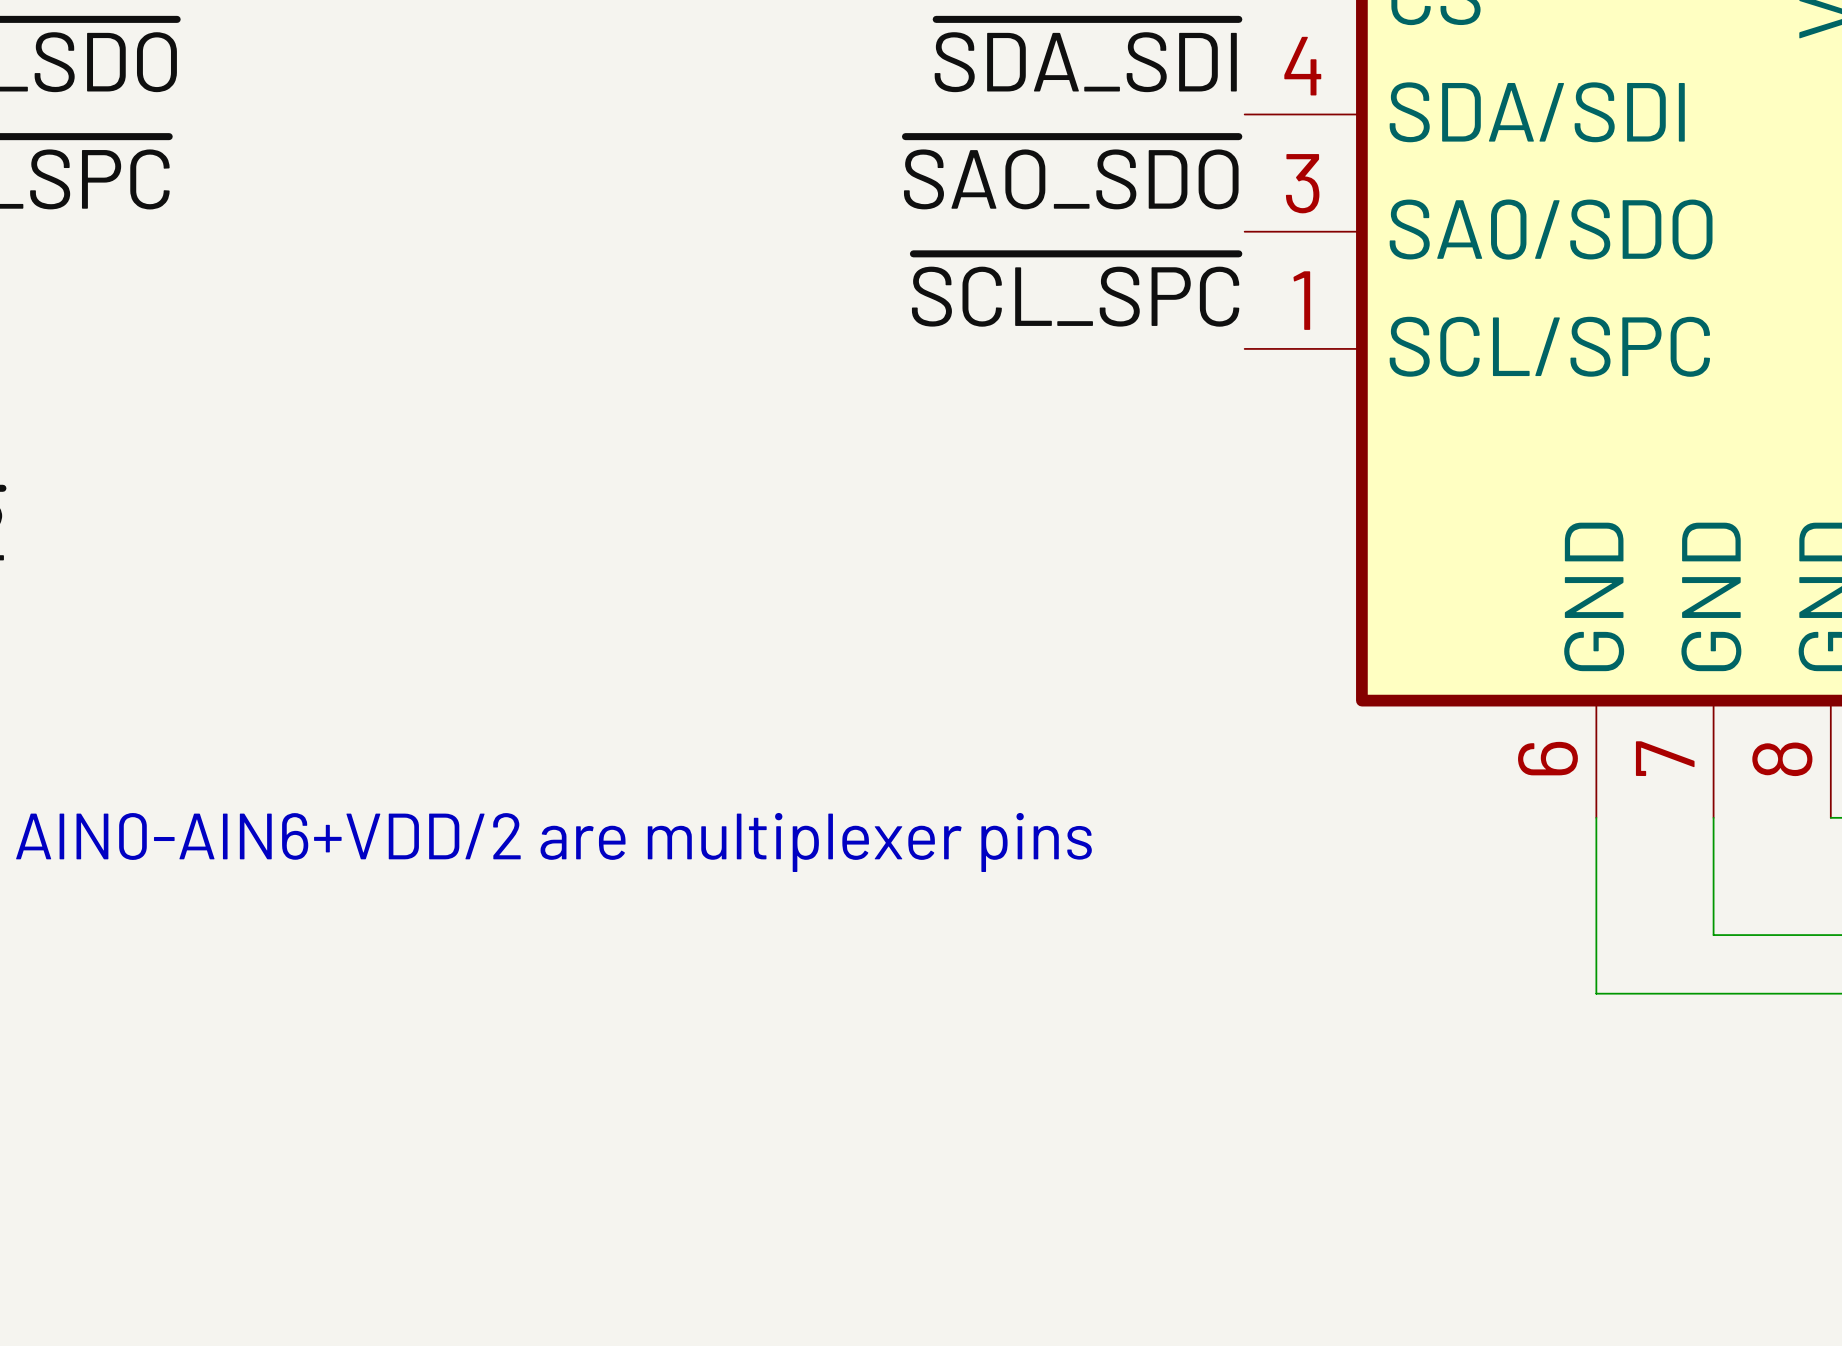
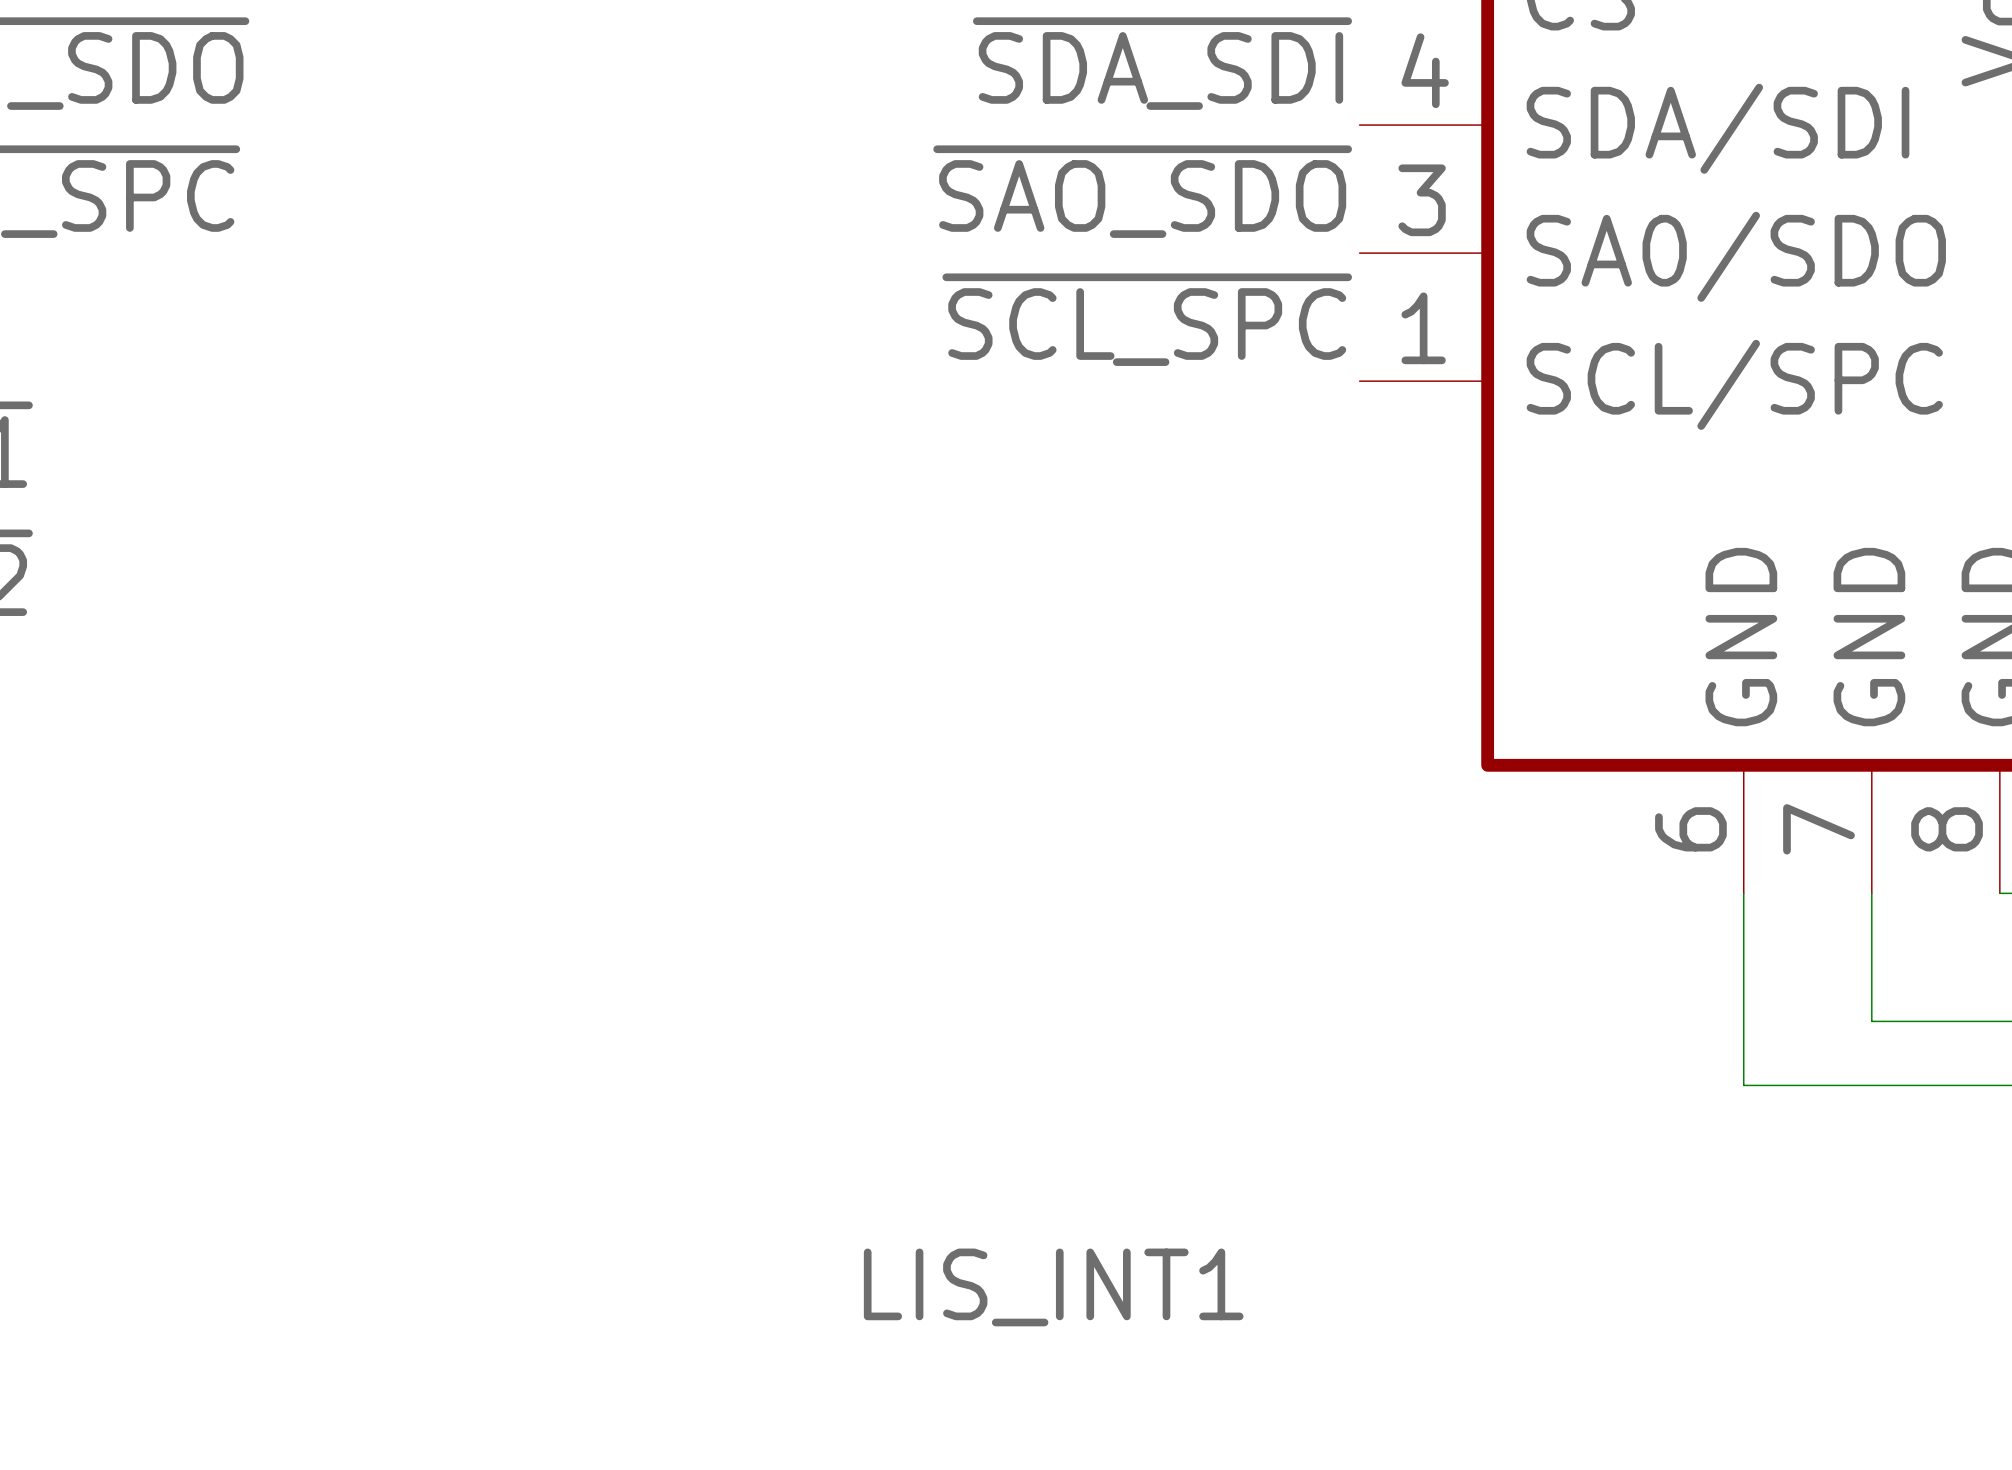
text: AIN0-AIN6+VDD/2 are multiplexer pins (553, 842) -> none
label: none -> LIS_INT1 (1053, 1287)

